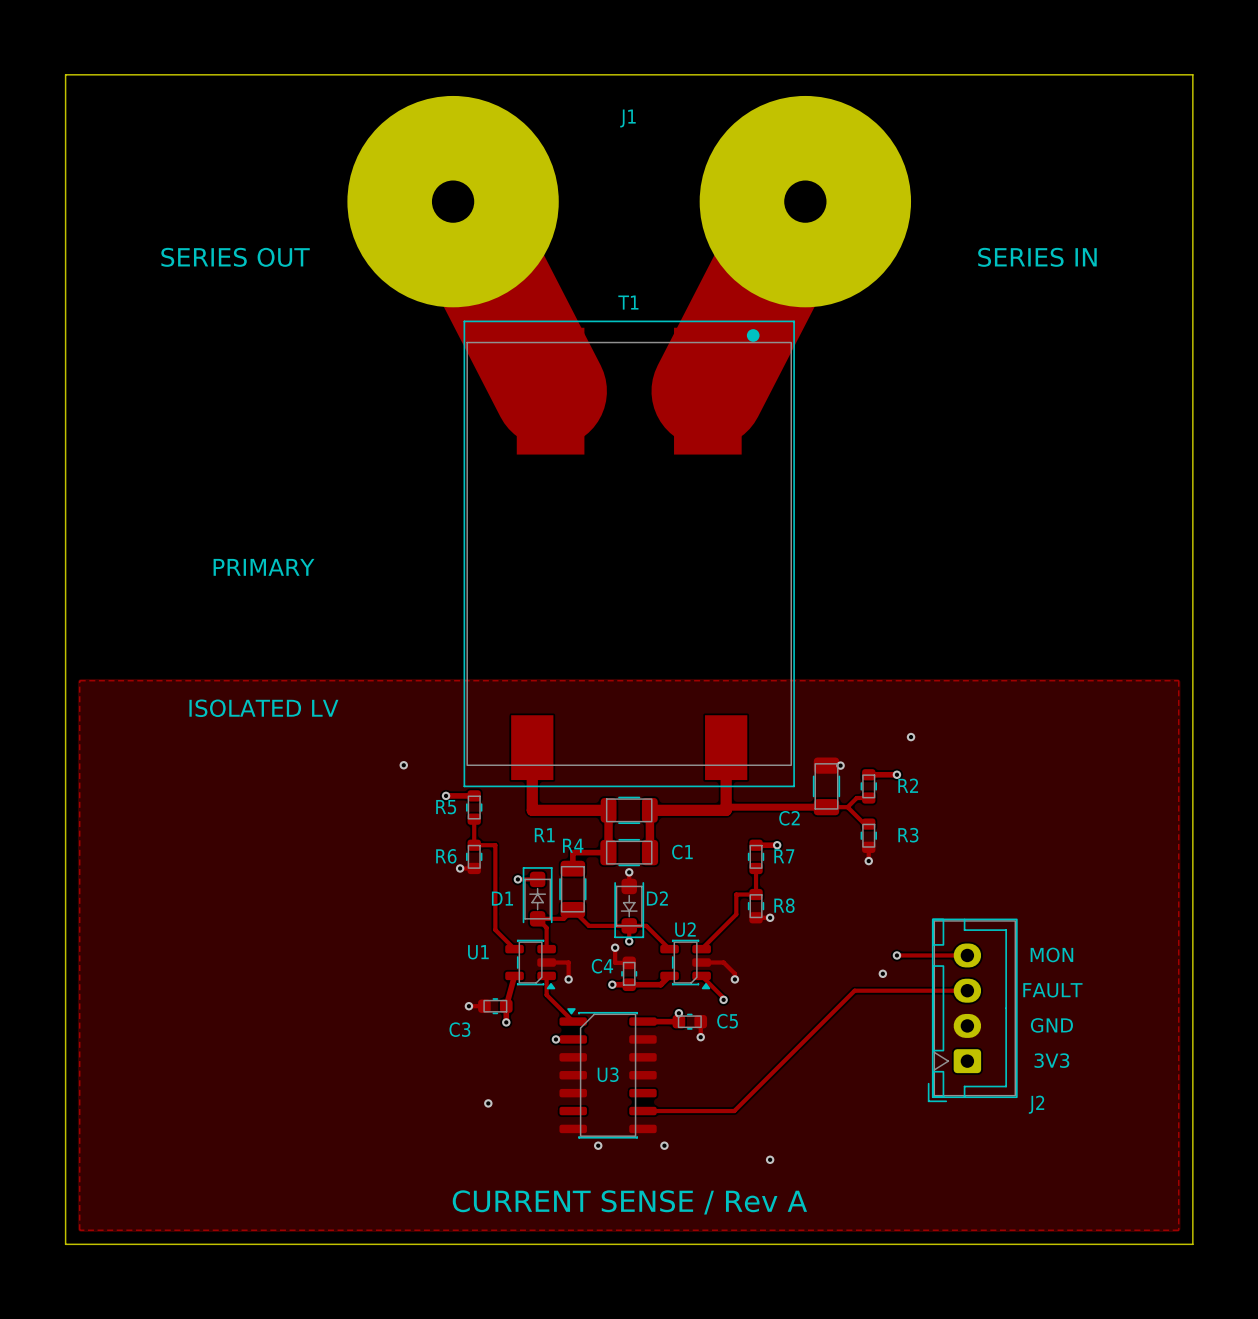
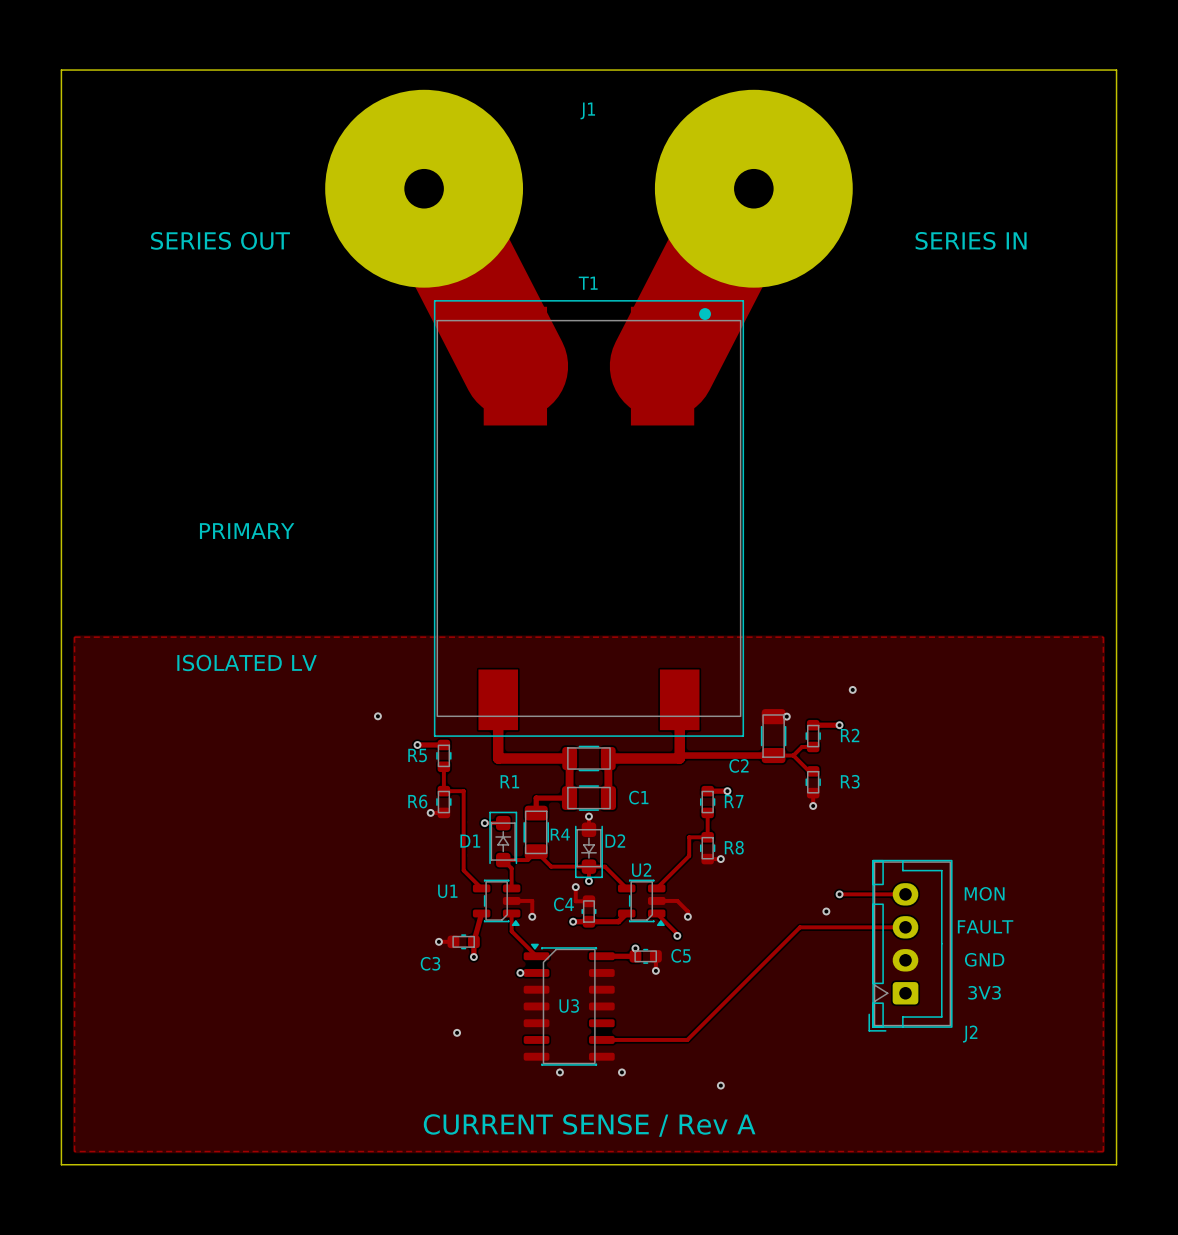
R4 name position: R4 (573, 845) -> R4 (560, 834)

